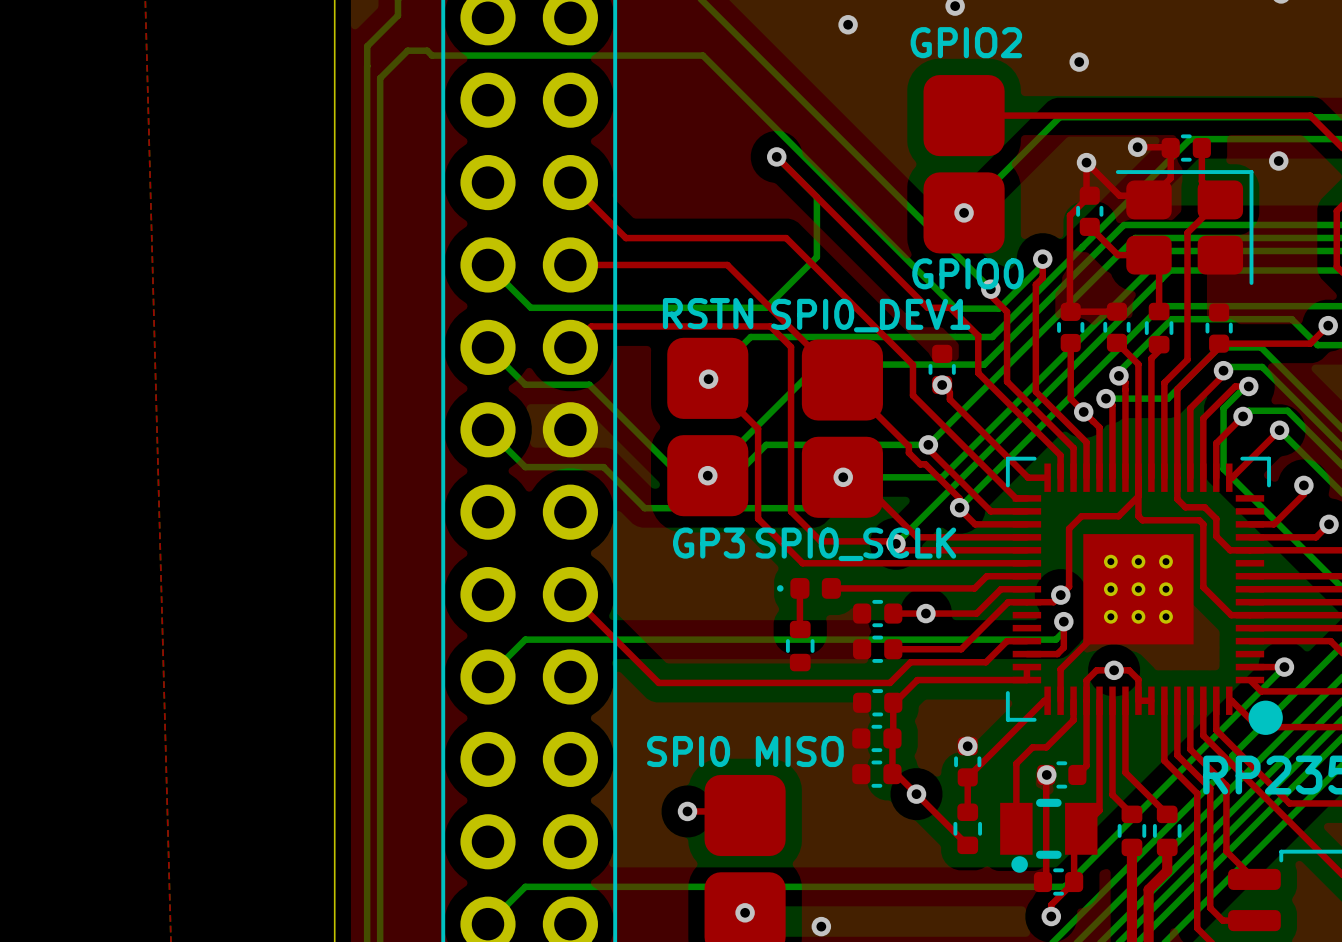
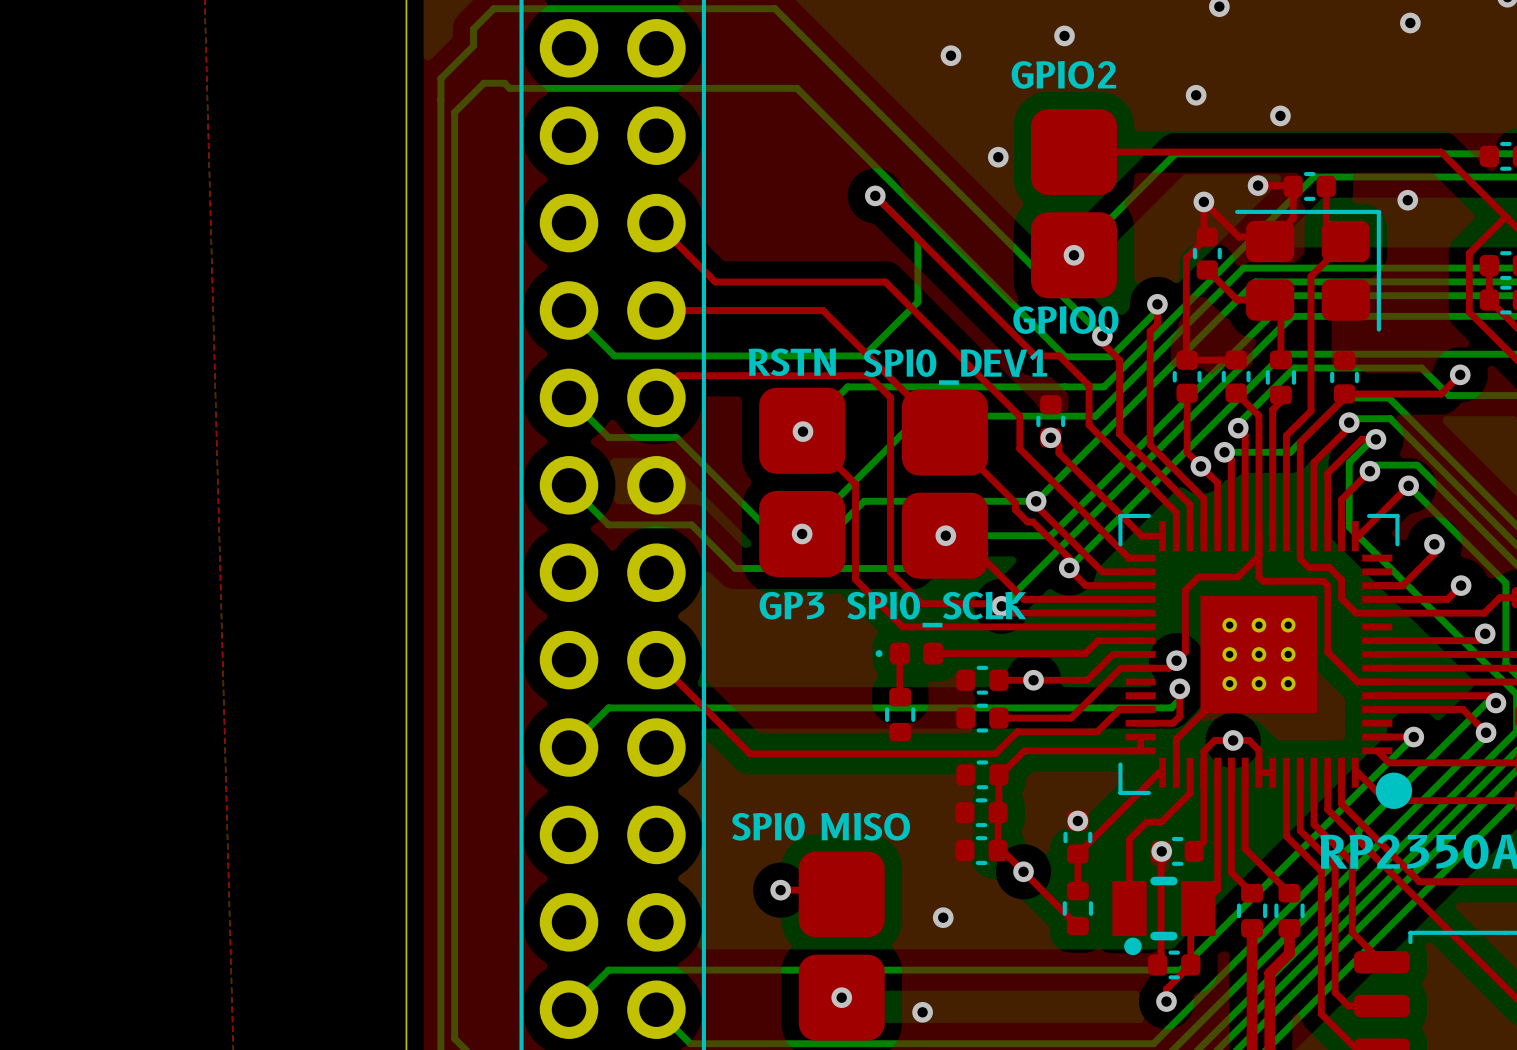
via: none -> (1280, 115)
via: none -> (998, 157)
via: none -> (943, 917)

